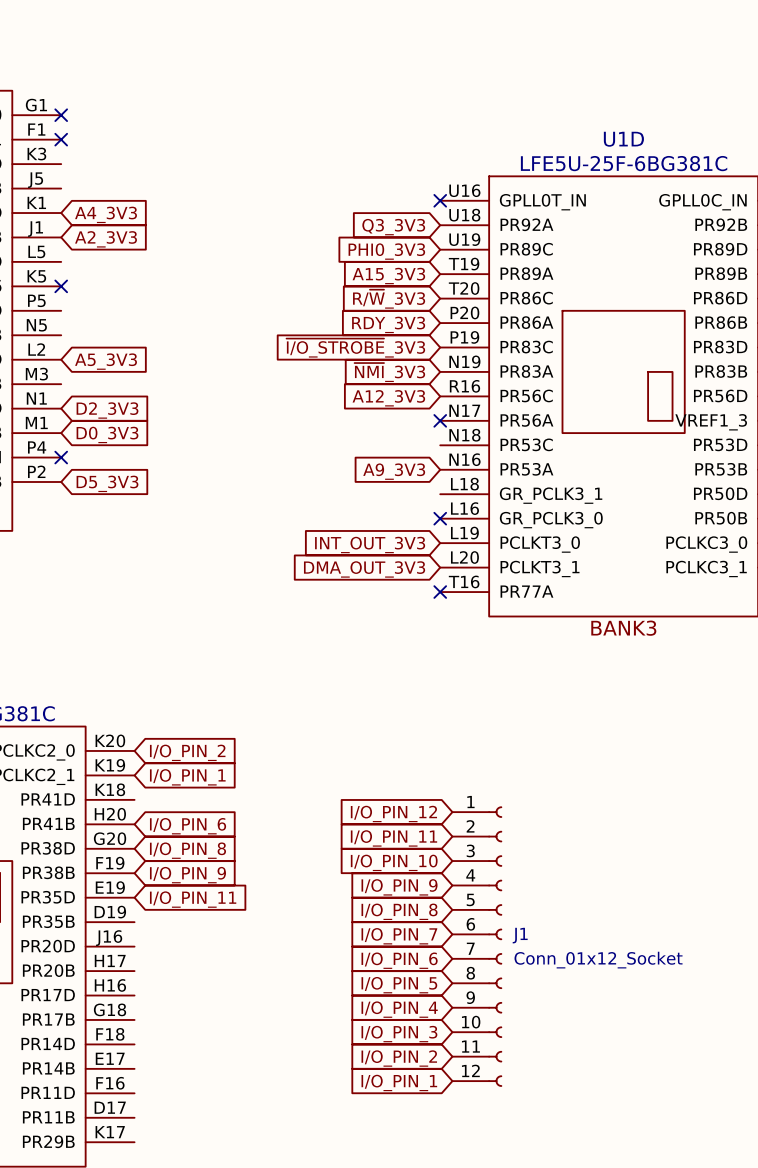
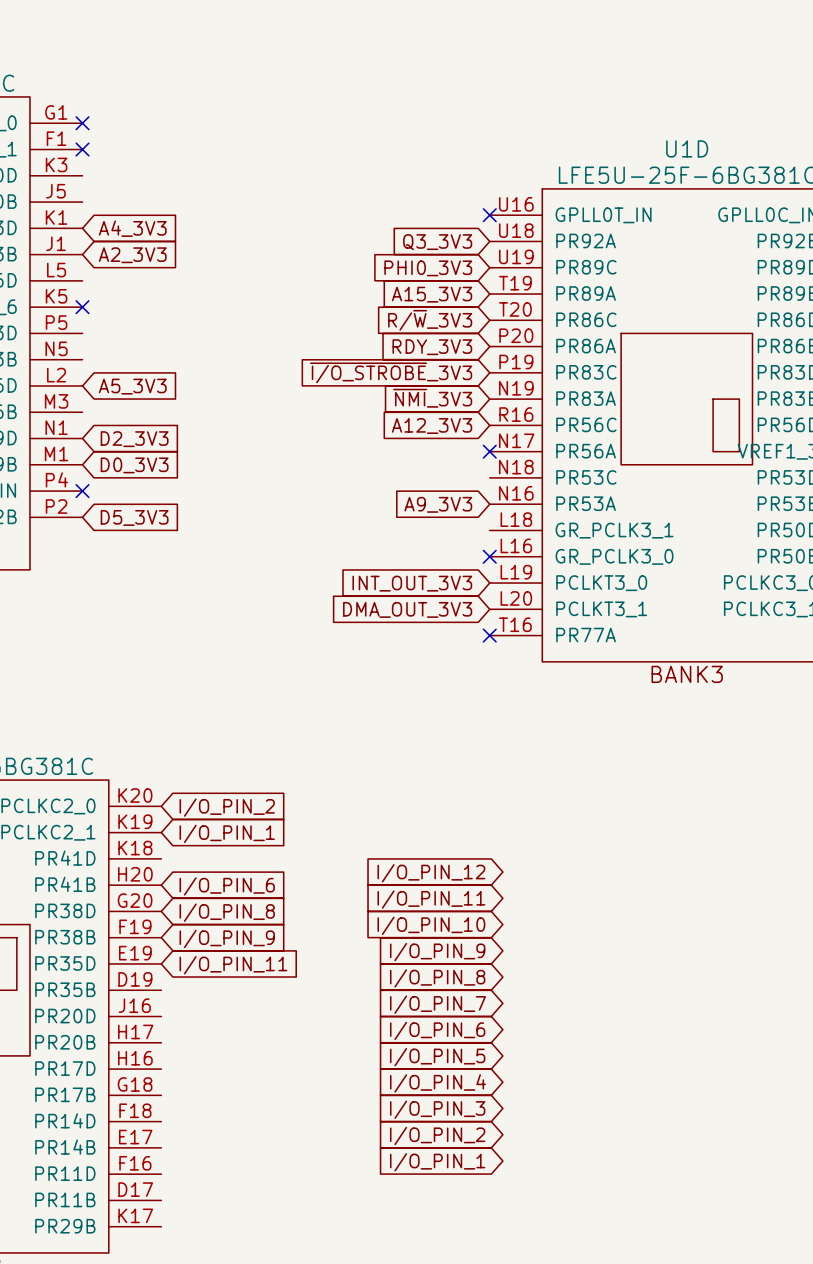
J1: Conn_01x12_Socket (477, 946) -> none

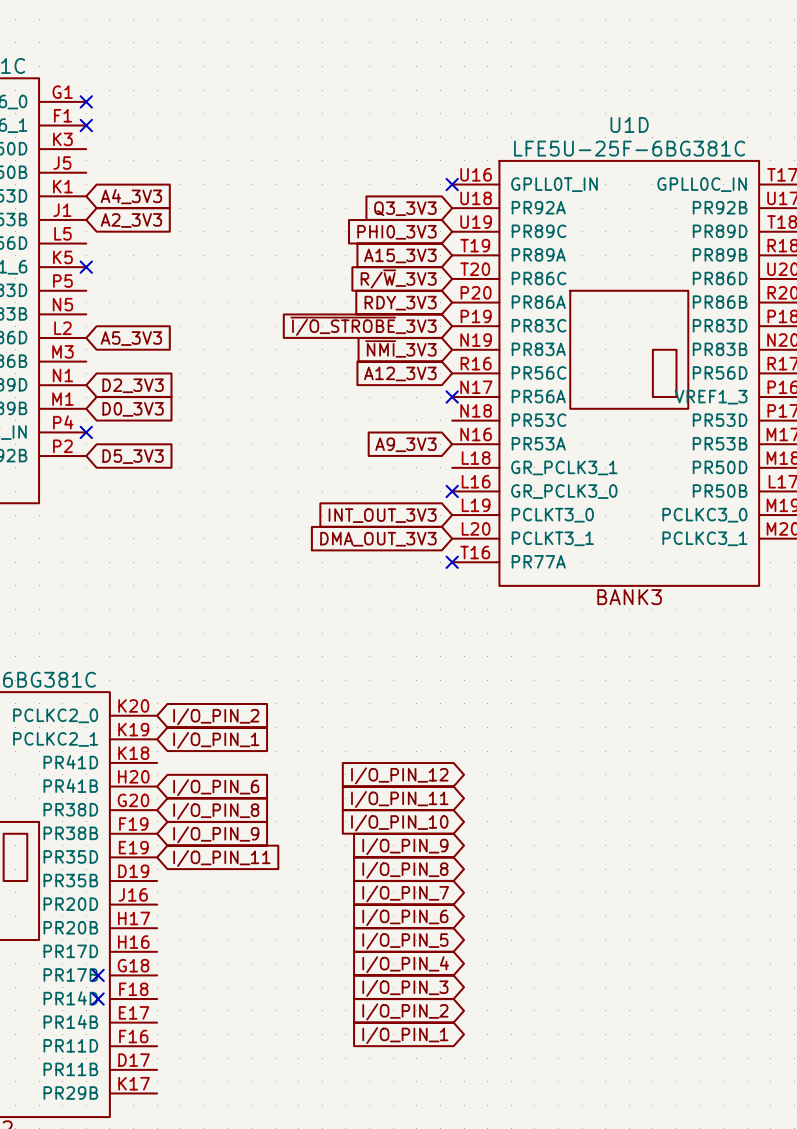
no-connect mark: none -> (98, 975)
no-connect mark: none -> (98, 999)

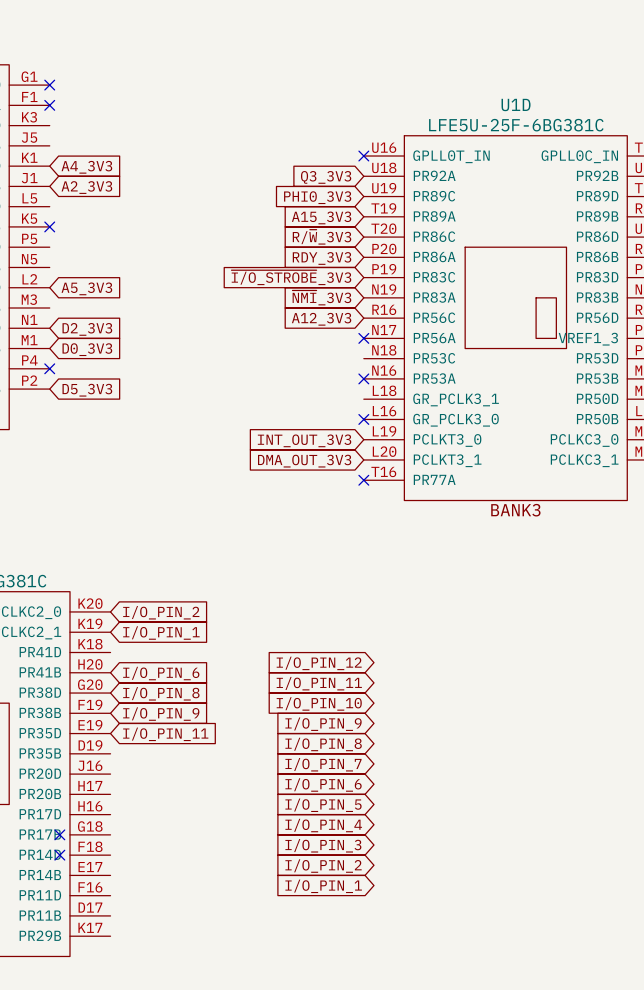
global label: A9_3V3 (405, 444) -> none
no-connect mark: none -> (363, 378)

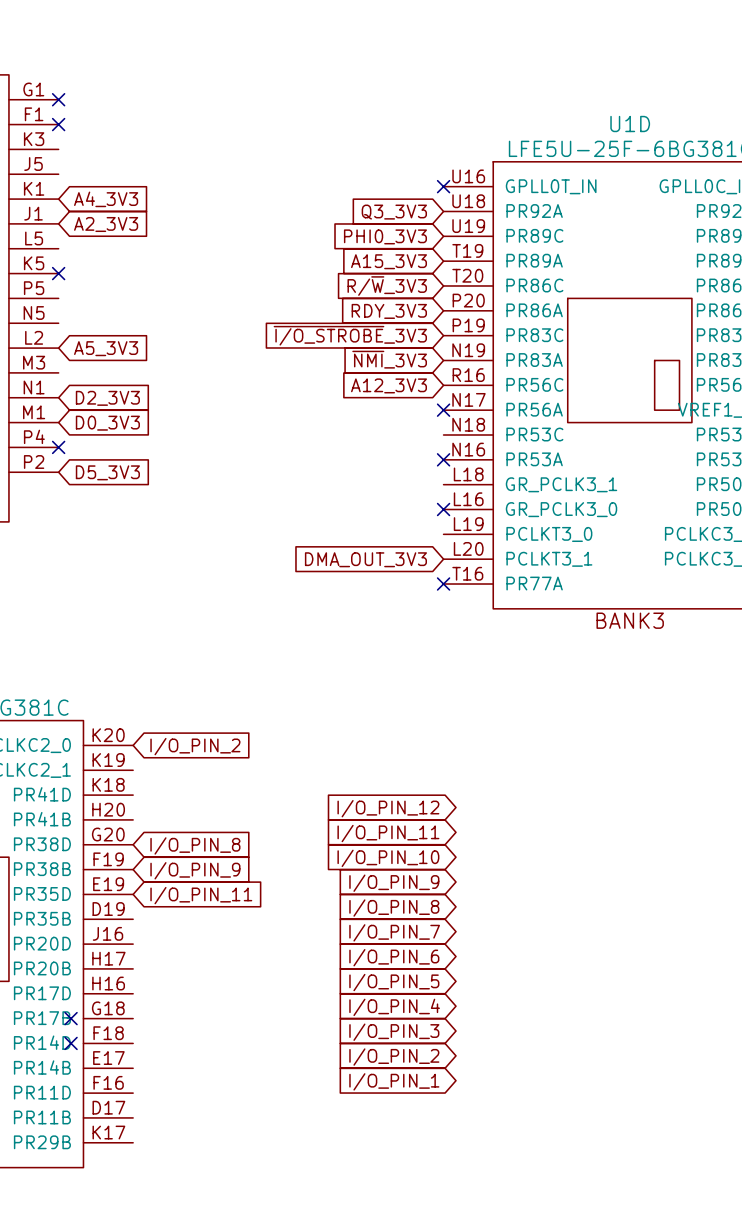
global label: INT_OUT_3V3 (304, 440) -> none
global label: I/O_PIN_1 (161, 633) -> none
global label: I/O_PIN_6 (161, 673) -> none

